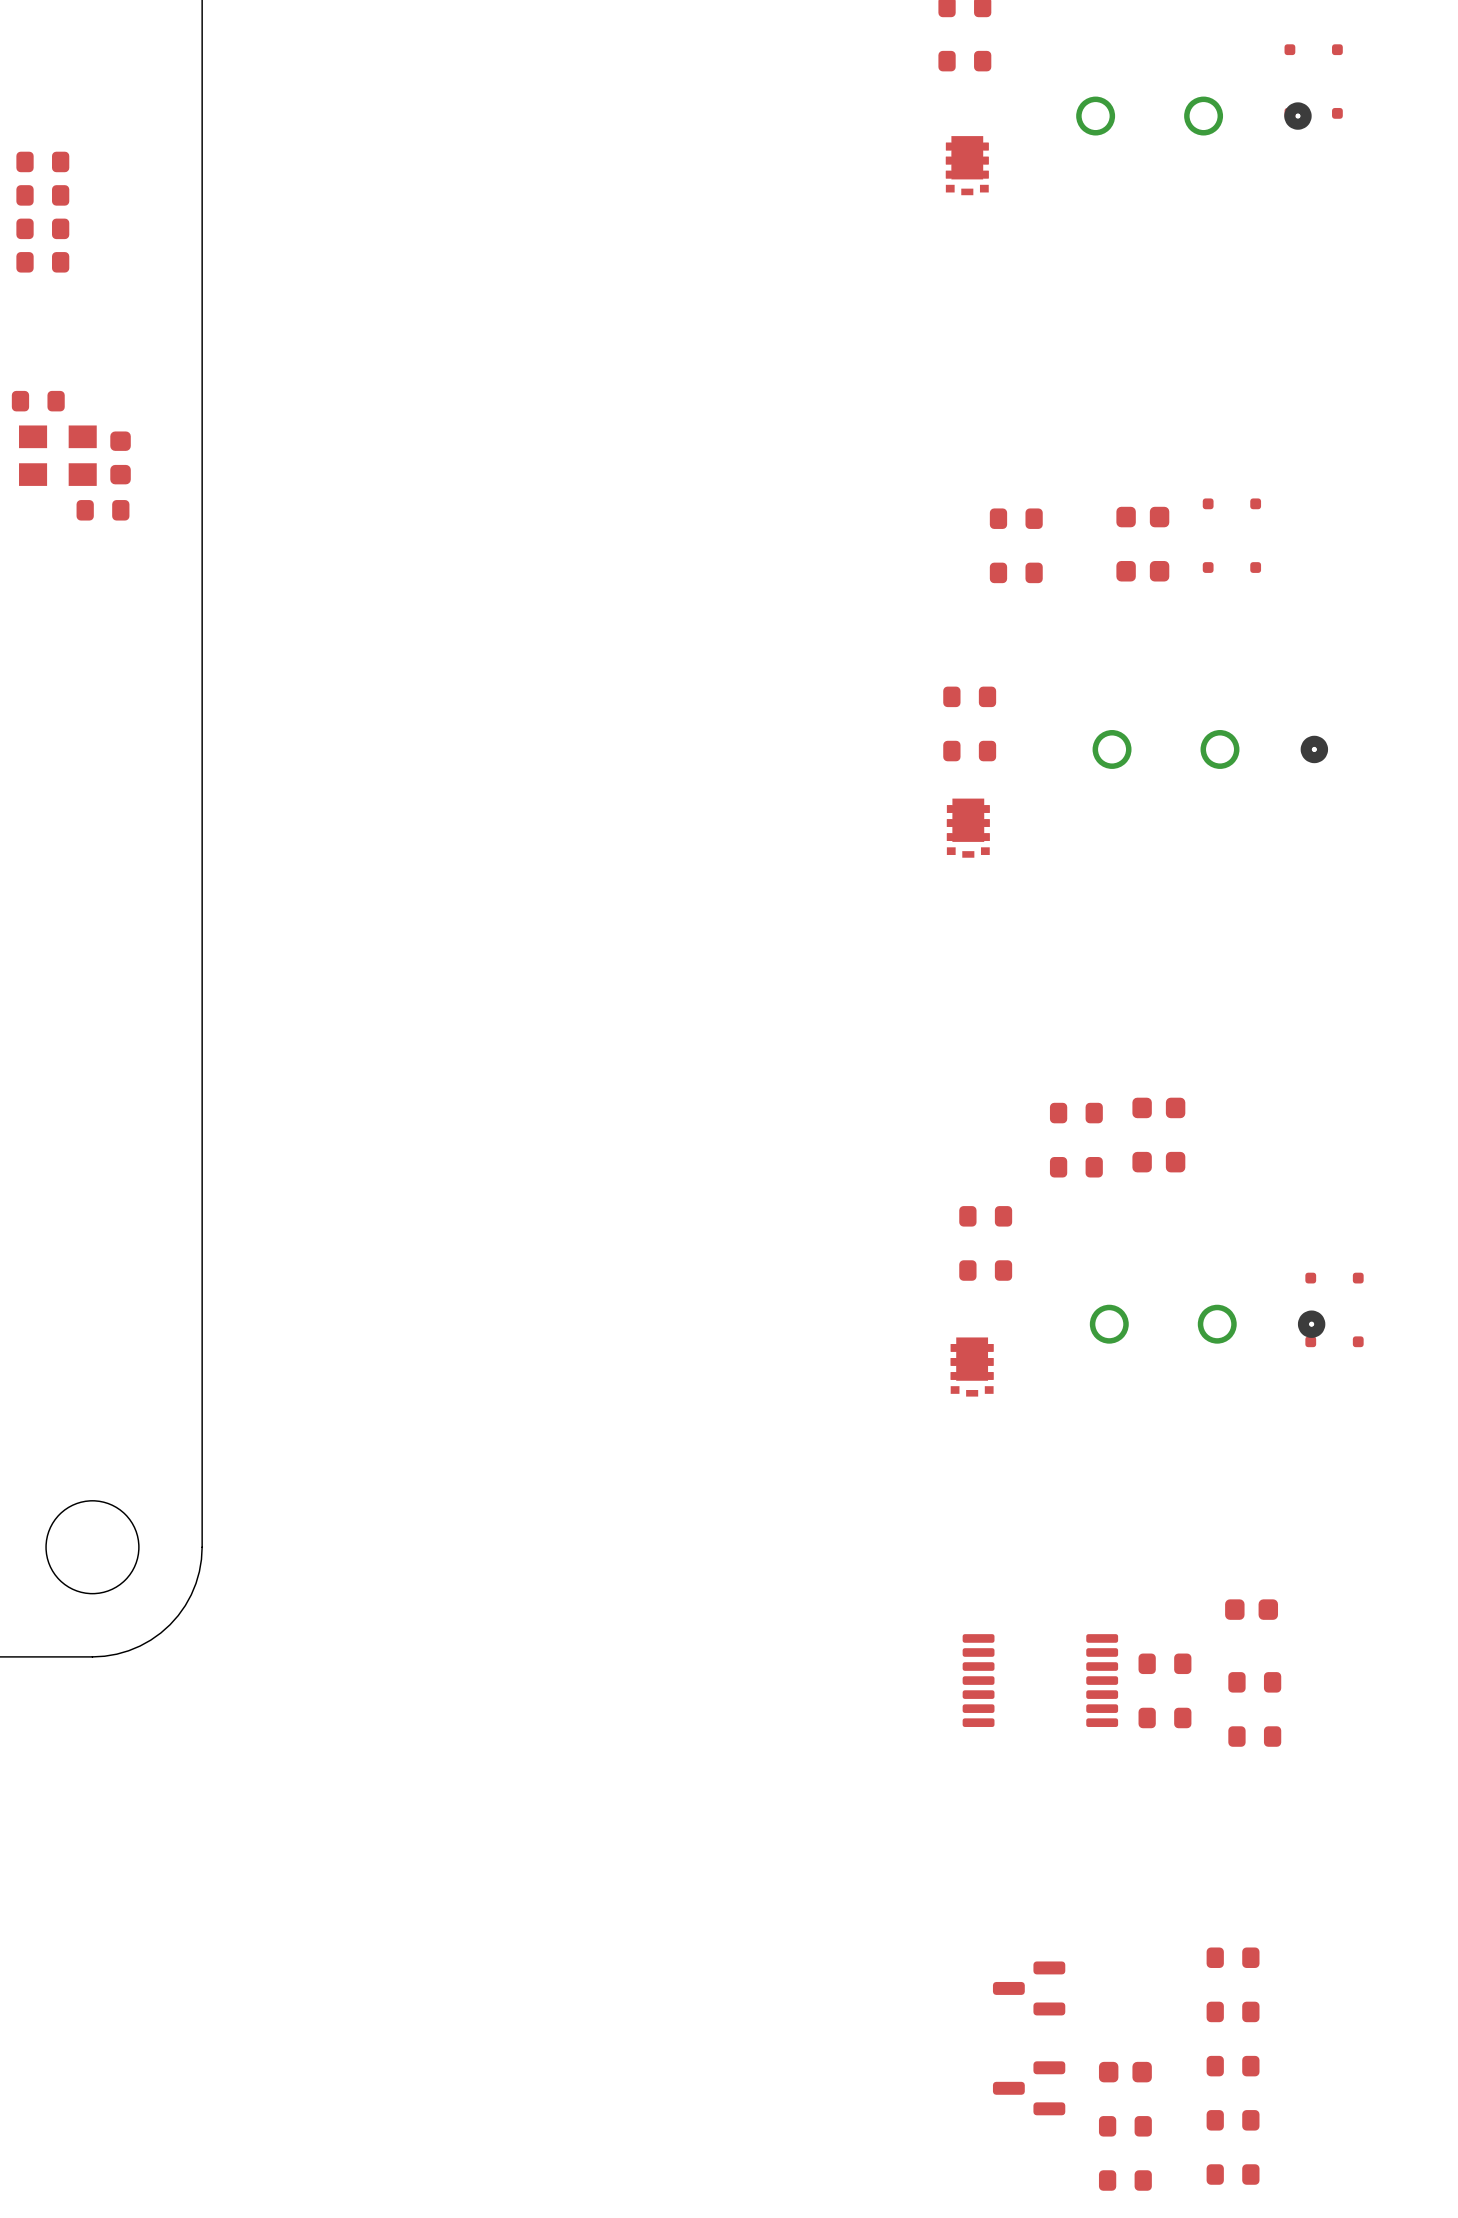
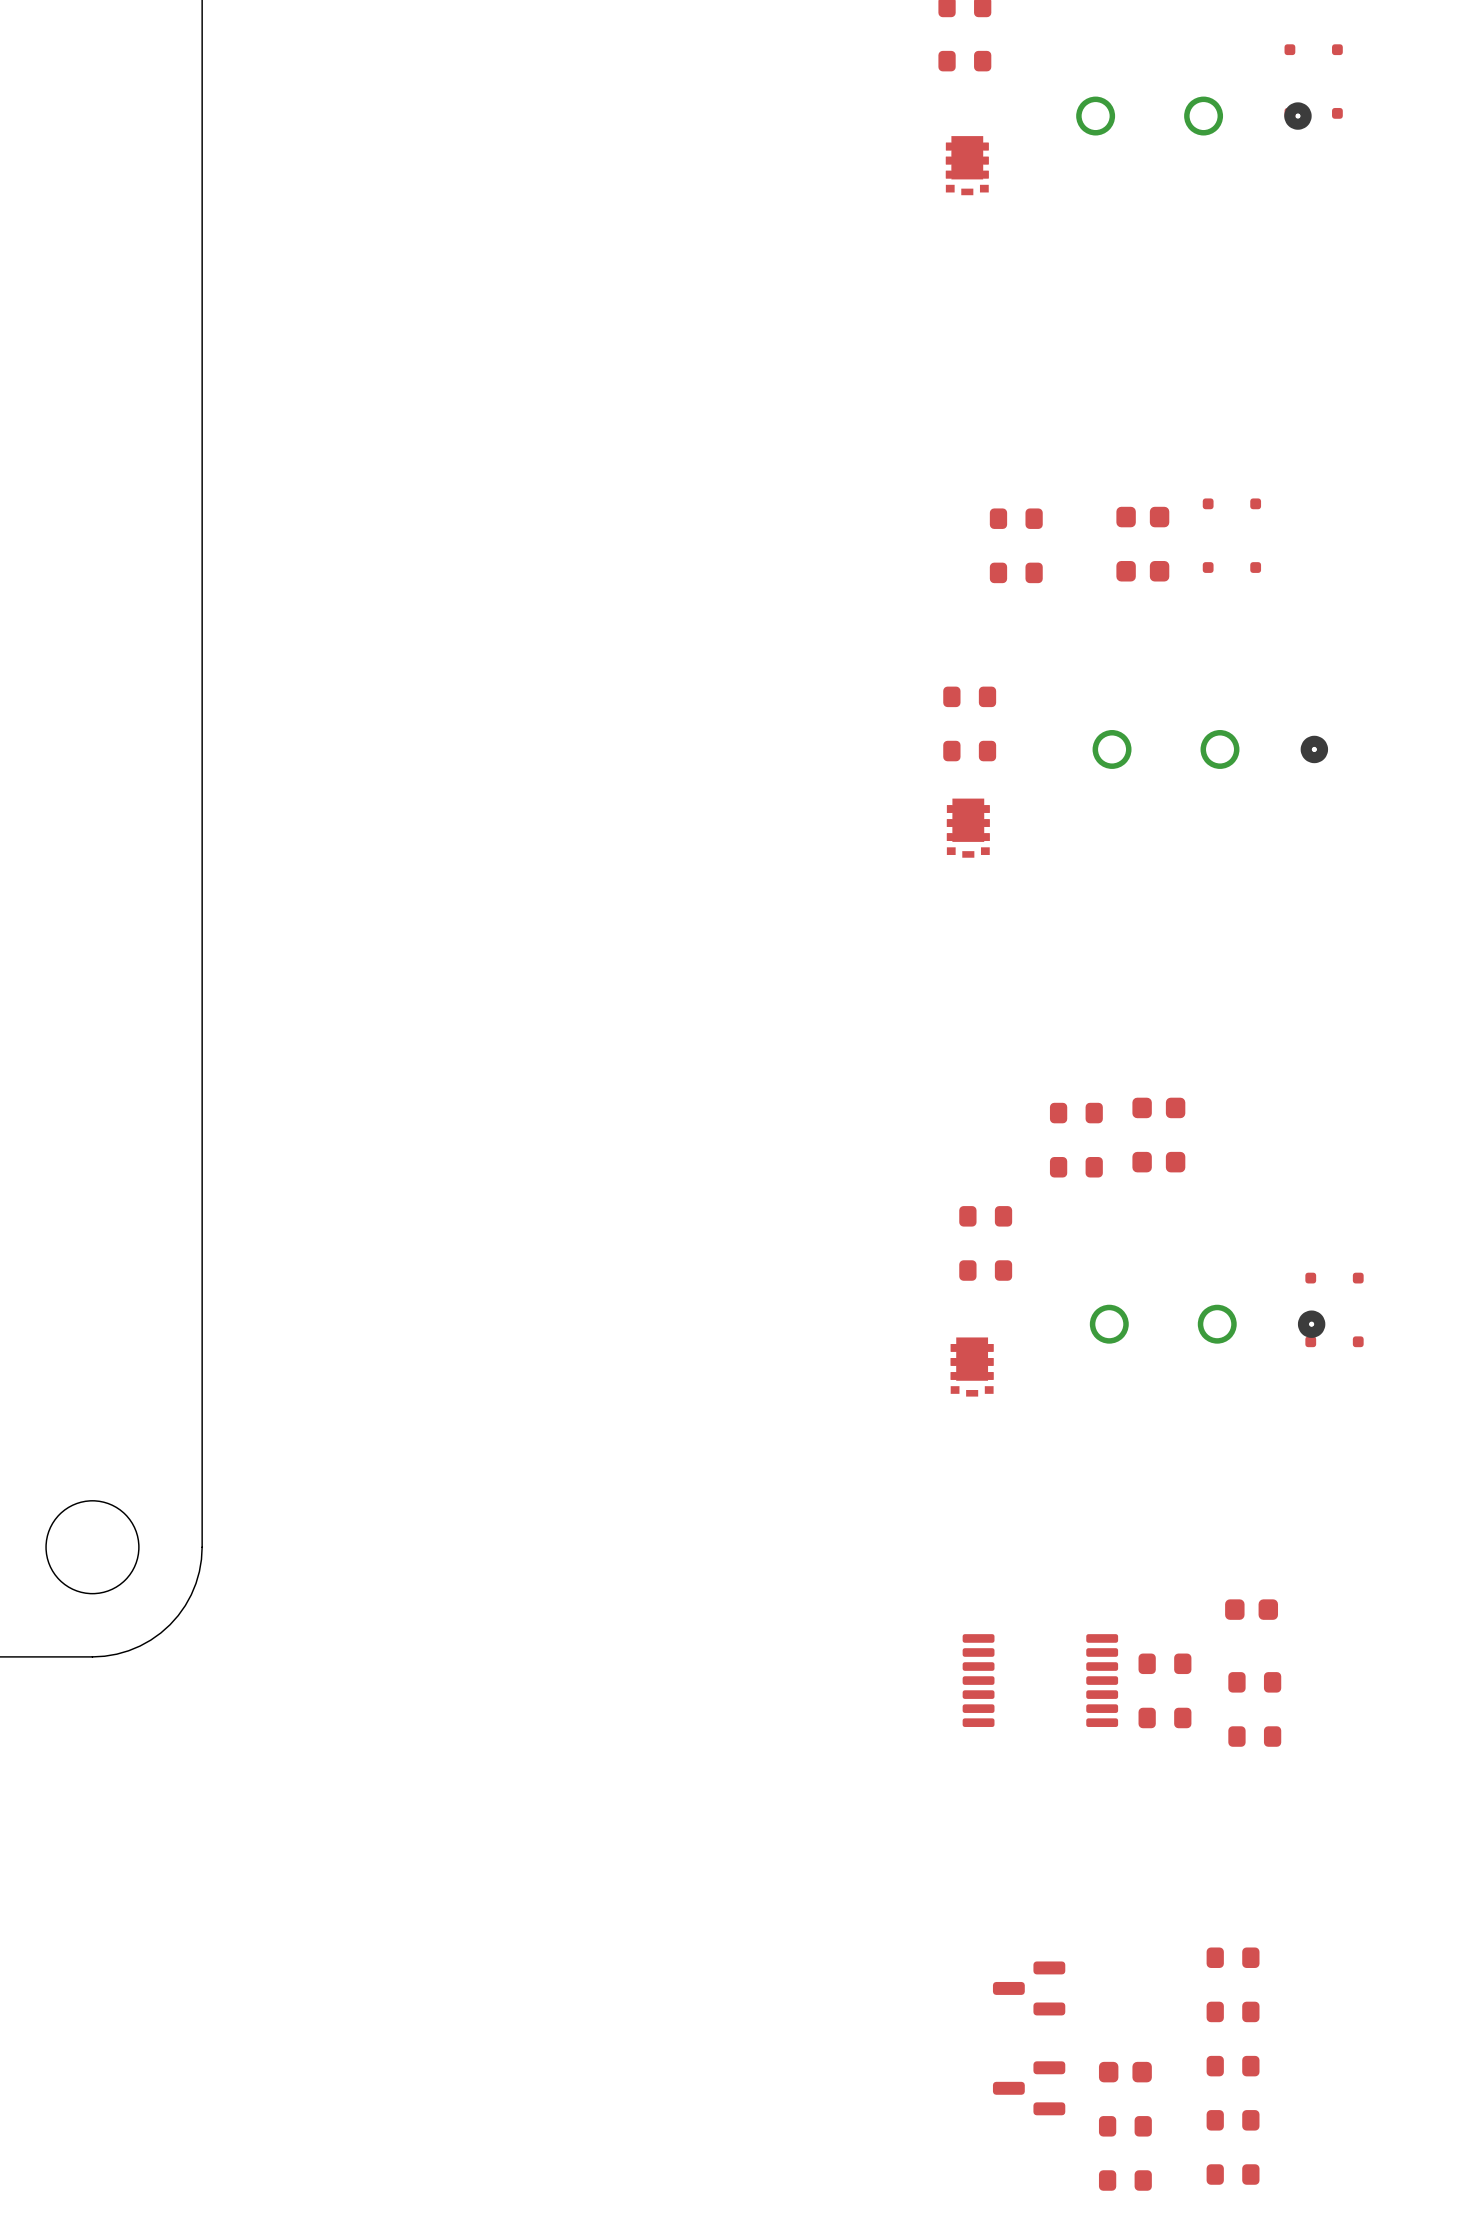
part: (42, 161) -> none
part: (42, 195) -> none
part: (42, 228) -> none
part: (42, 262) -> none
part: (38, 401) -> none
part: (57, 455) -> none
part: (120, 457) -> none
part: (103, 510) -> none

